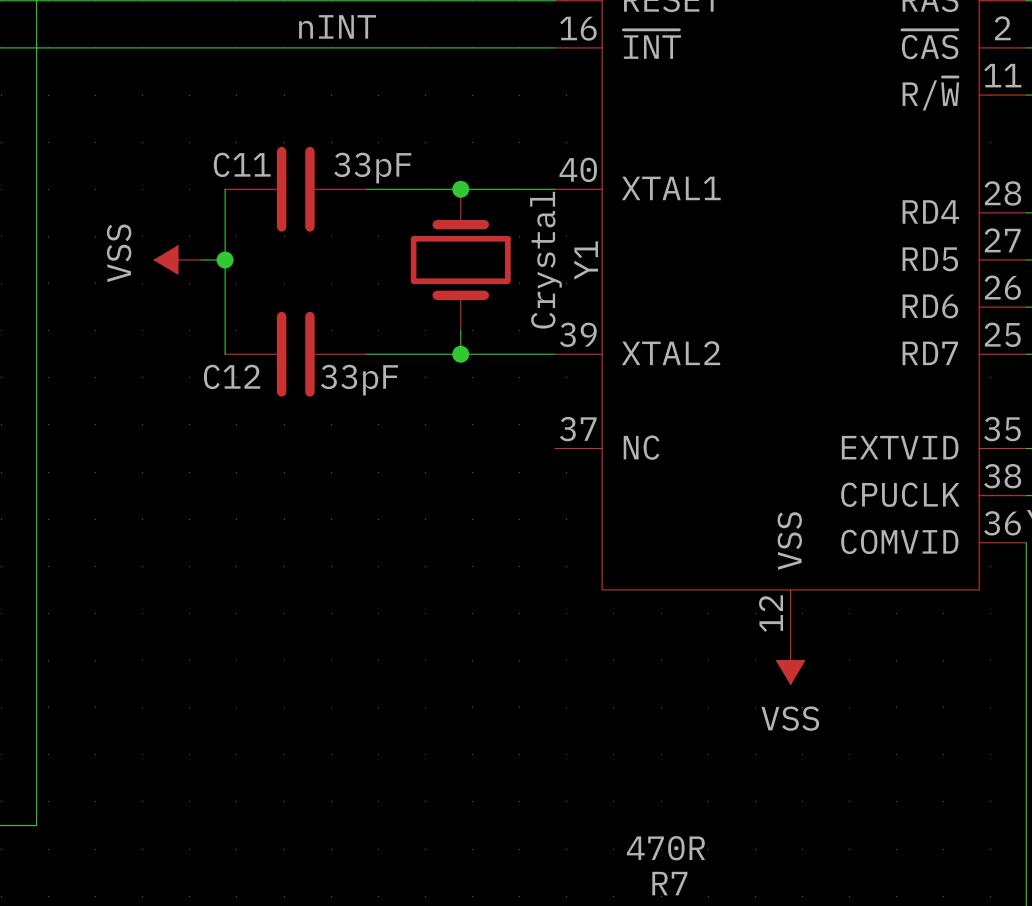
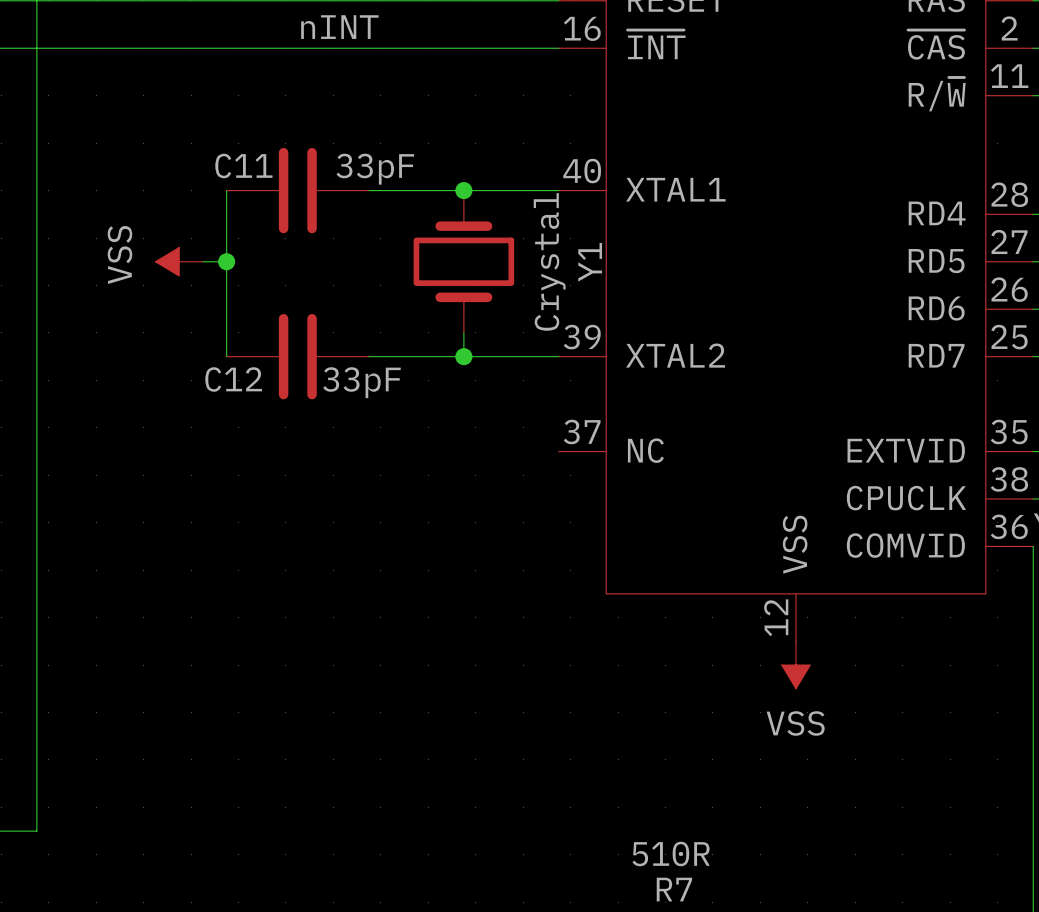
R7 value: 470R (665, 848) -> 510R (671, 853)

